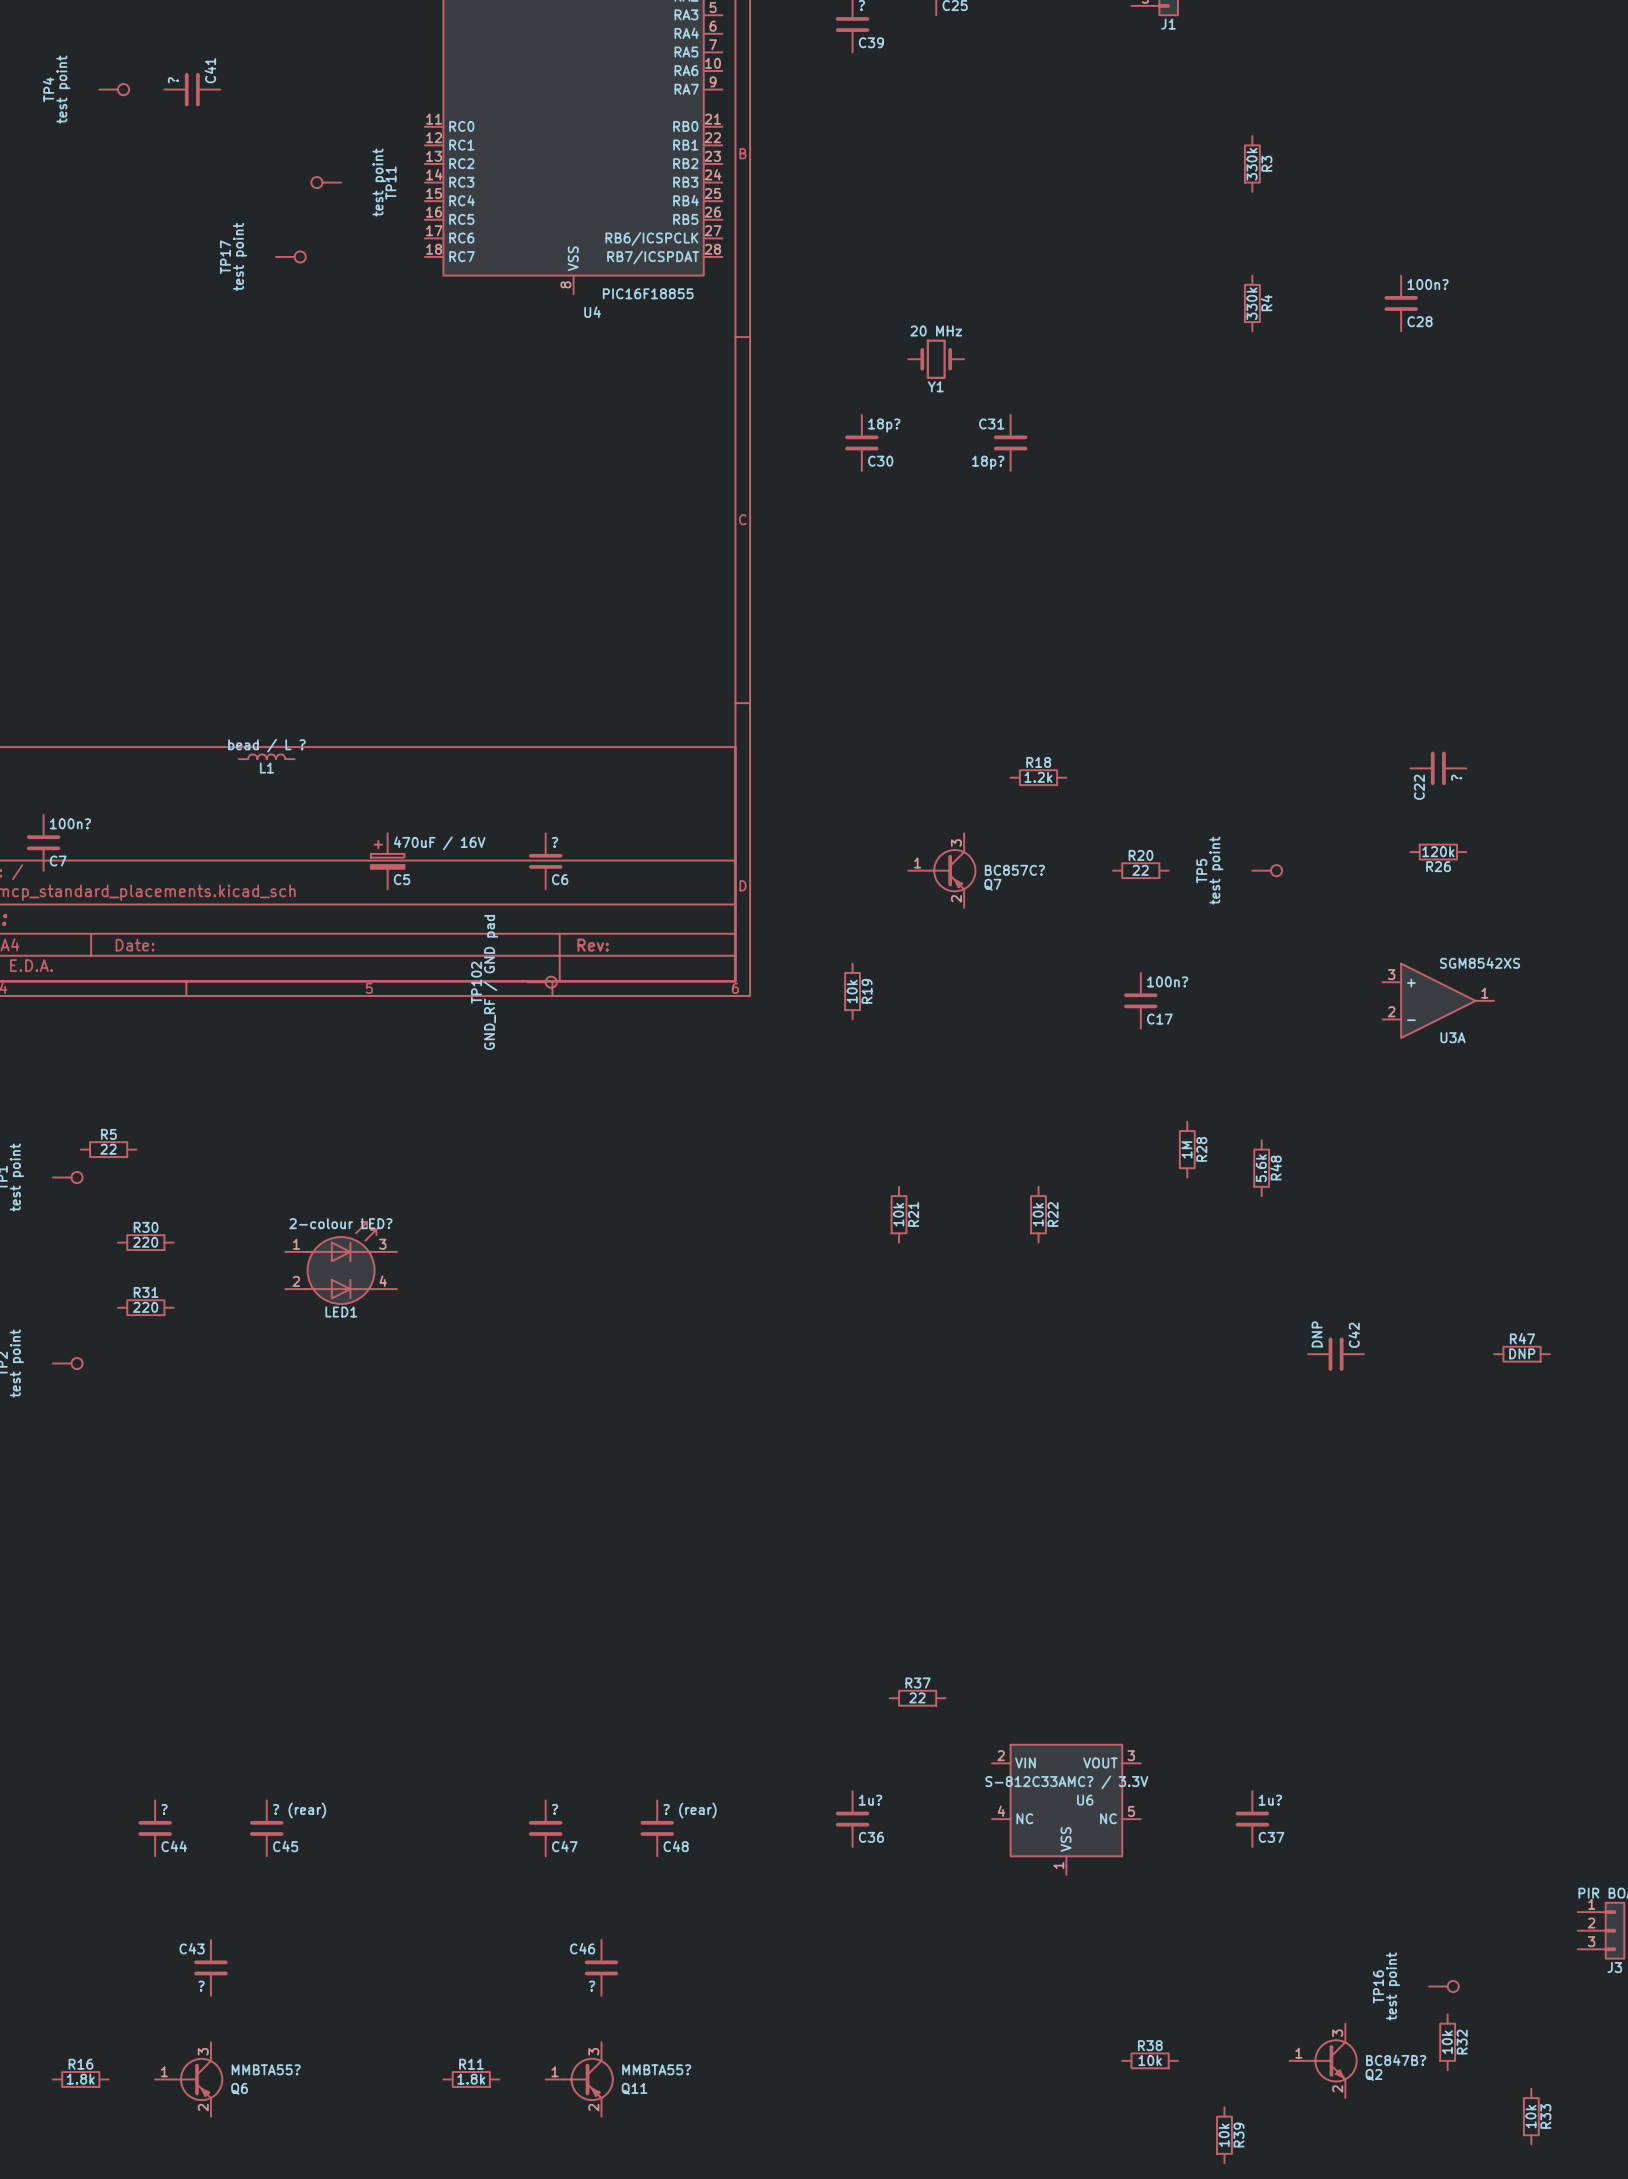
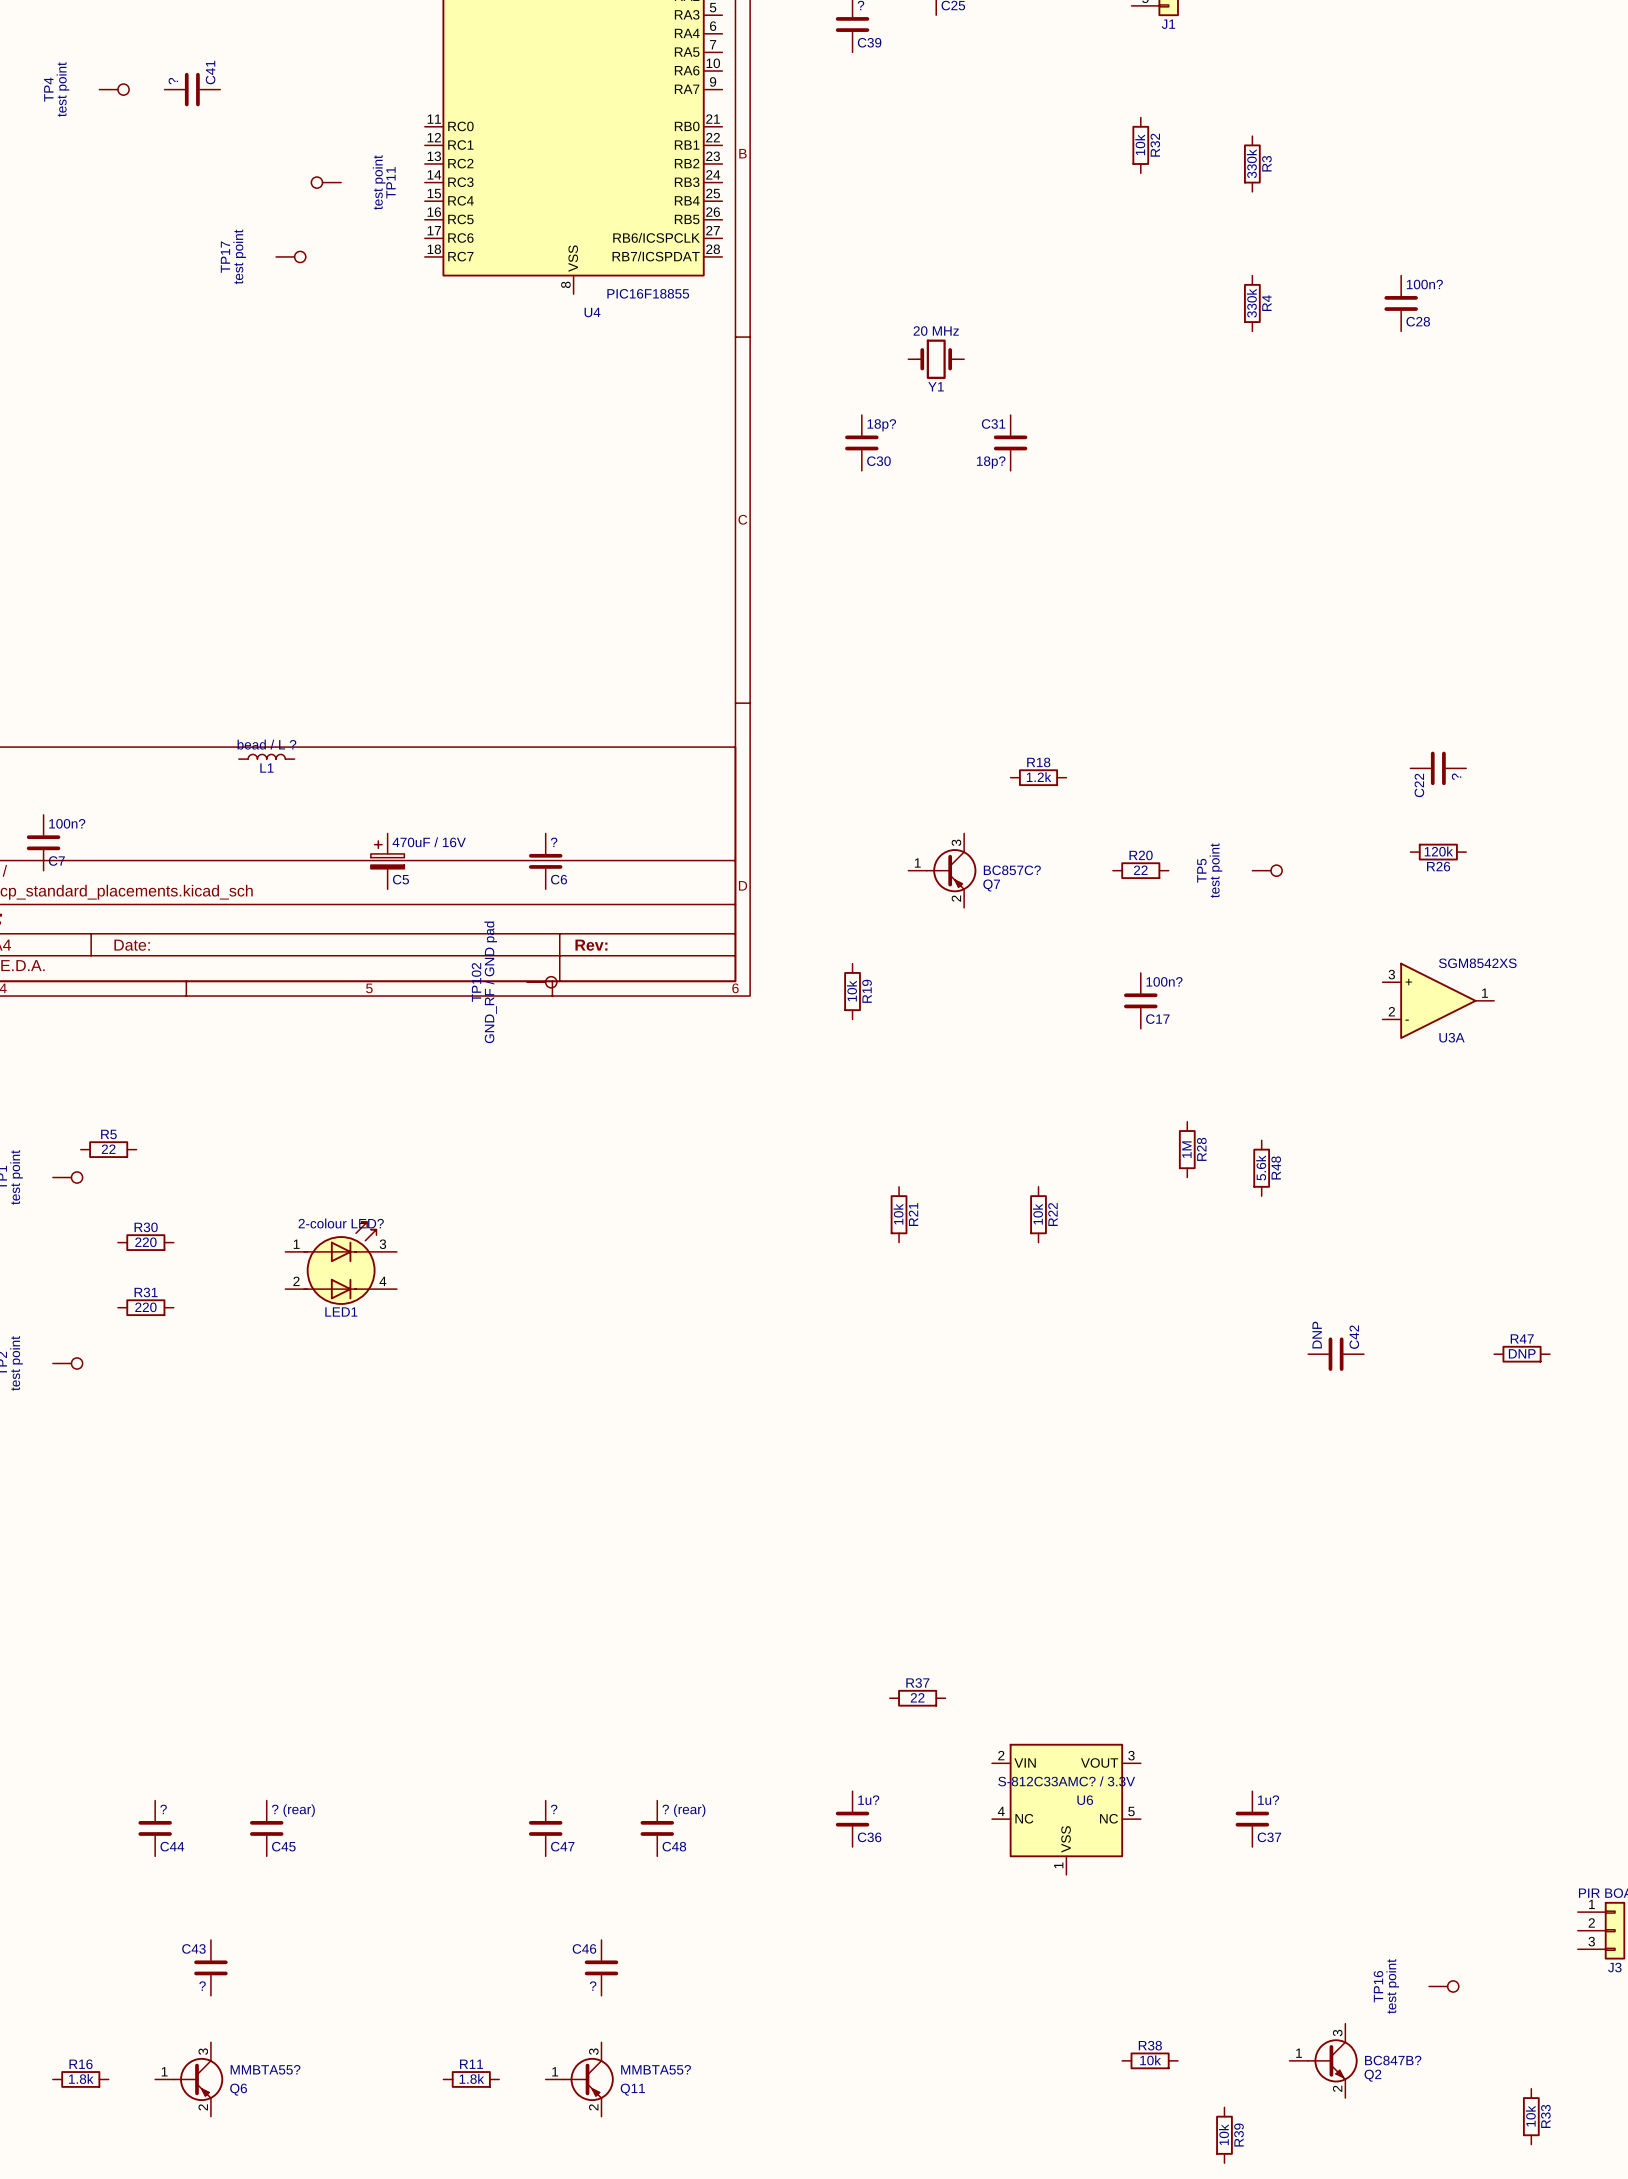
R32 position: (1447, 2042) -> (1140, 145)

